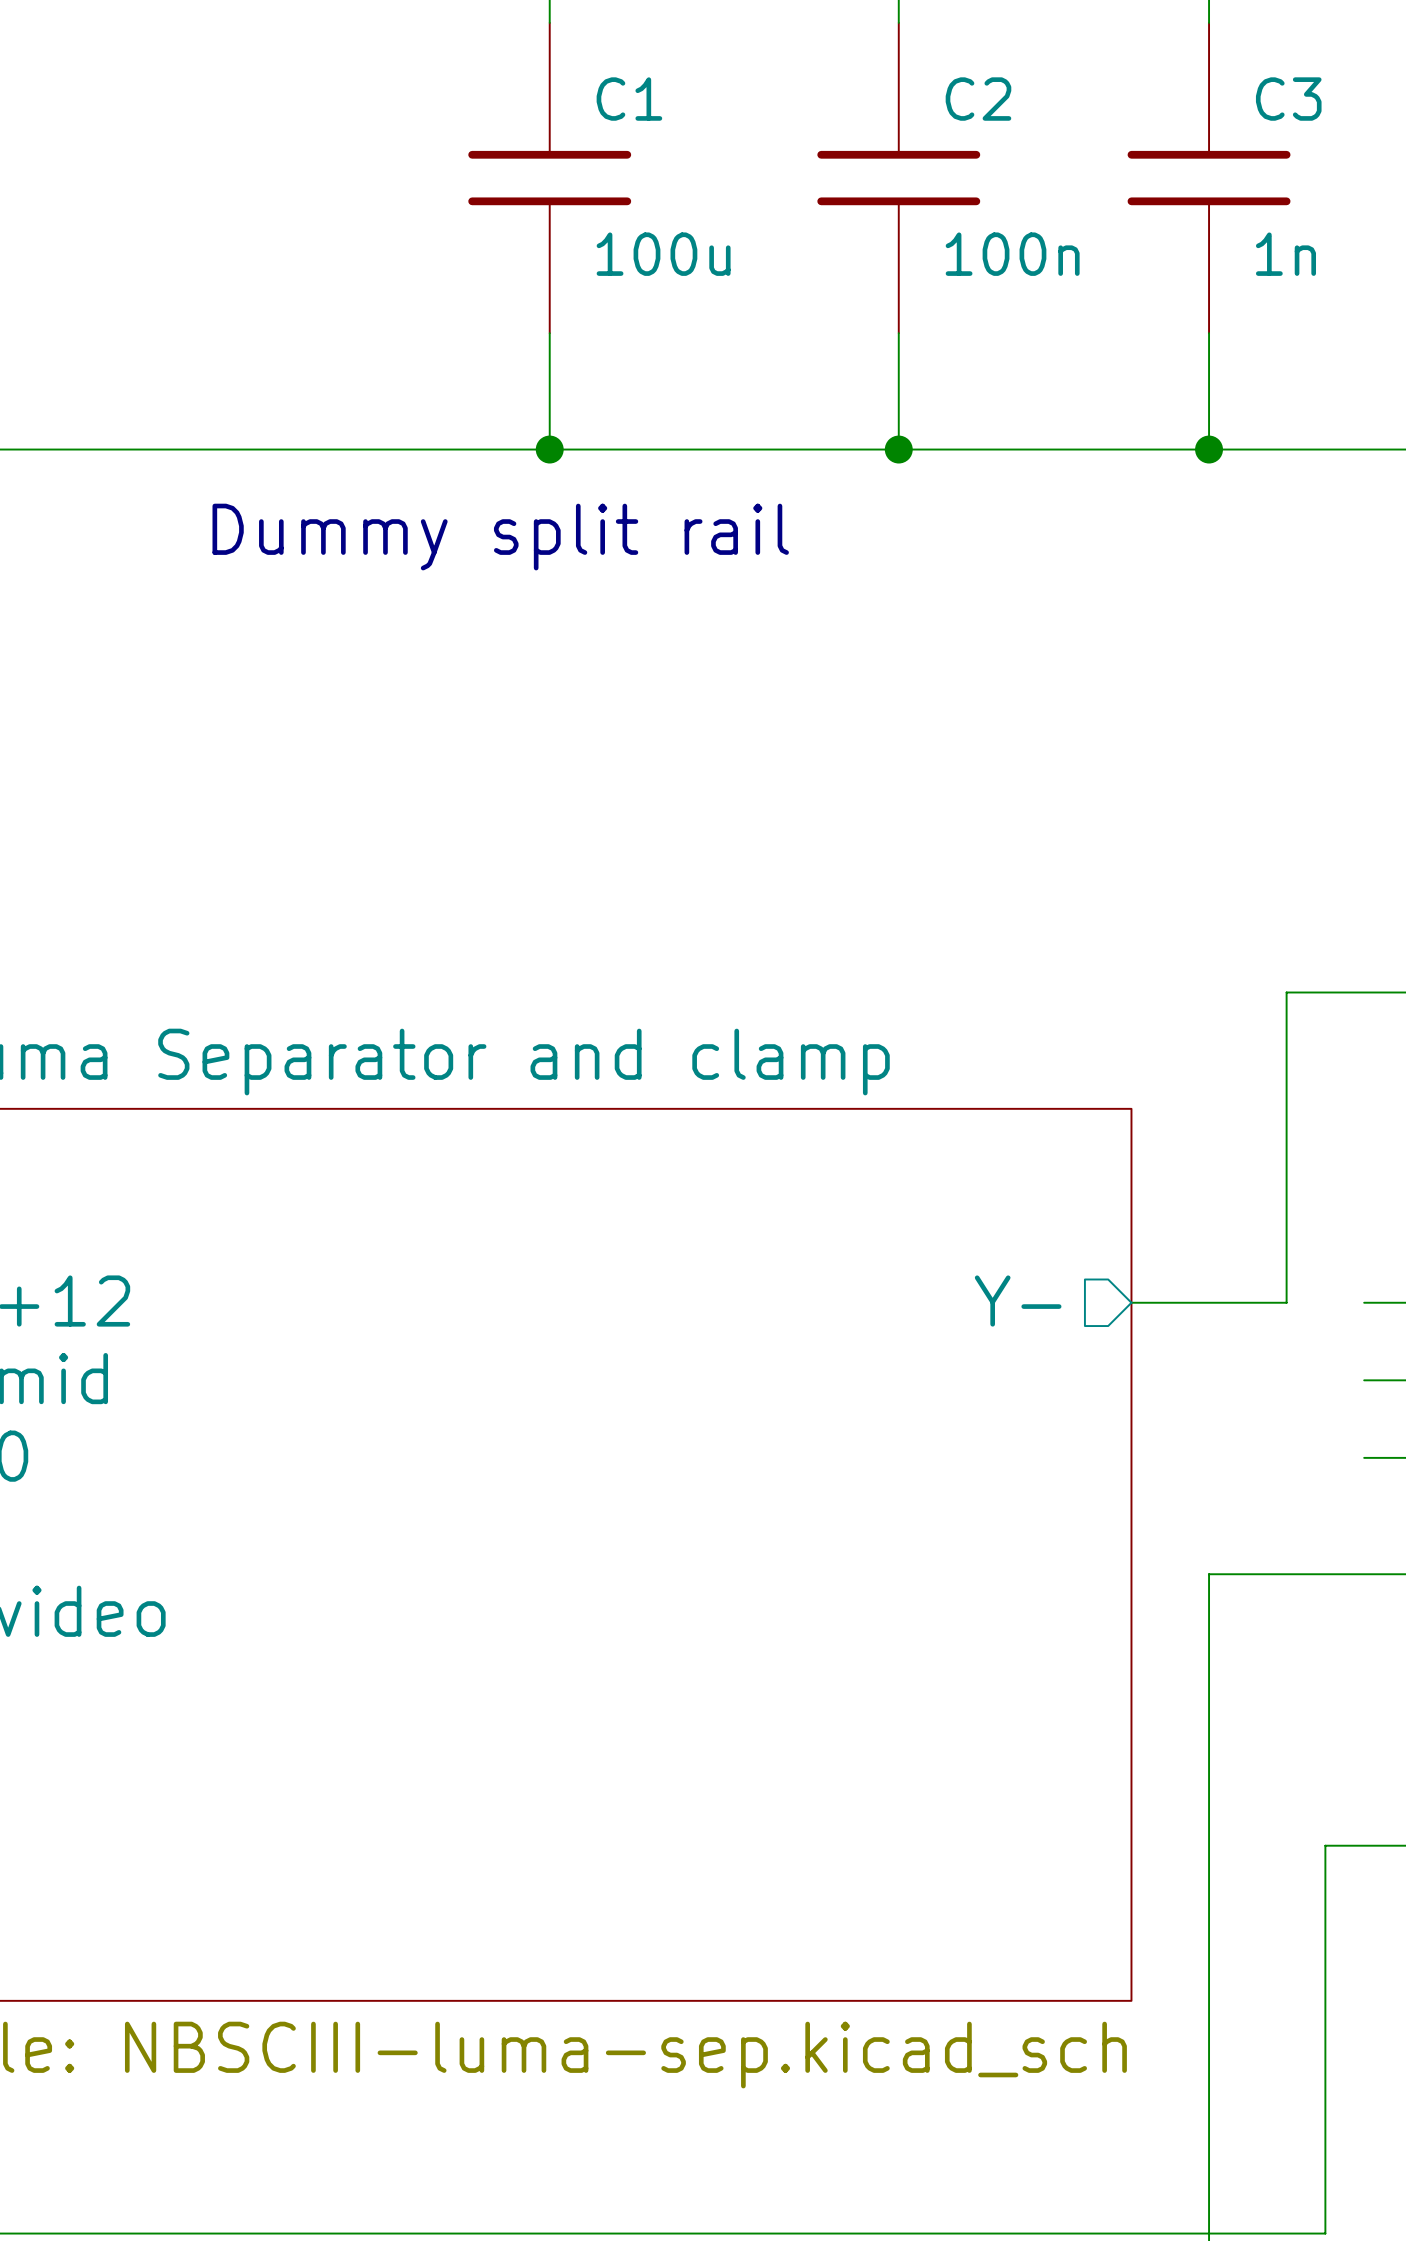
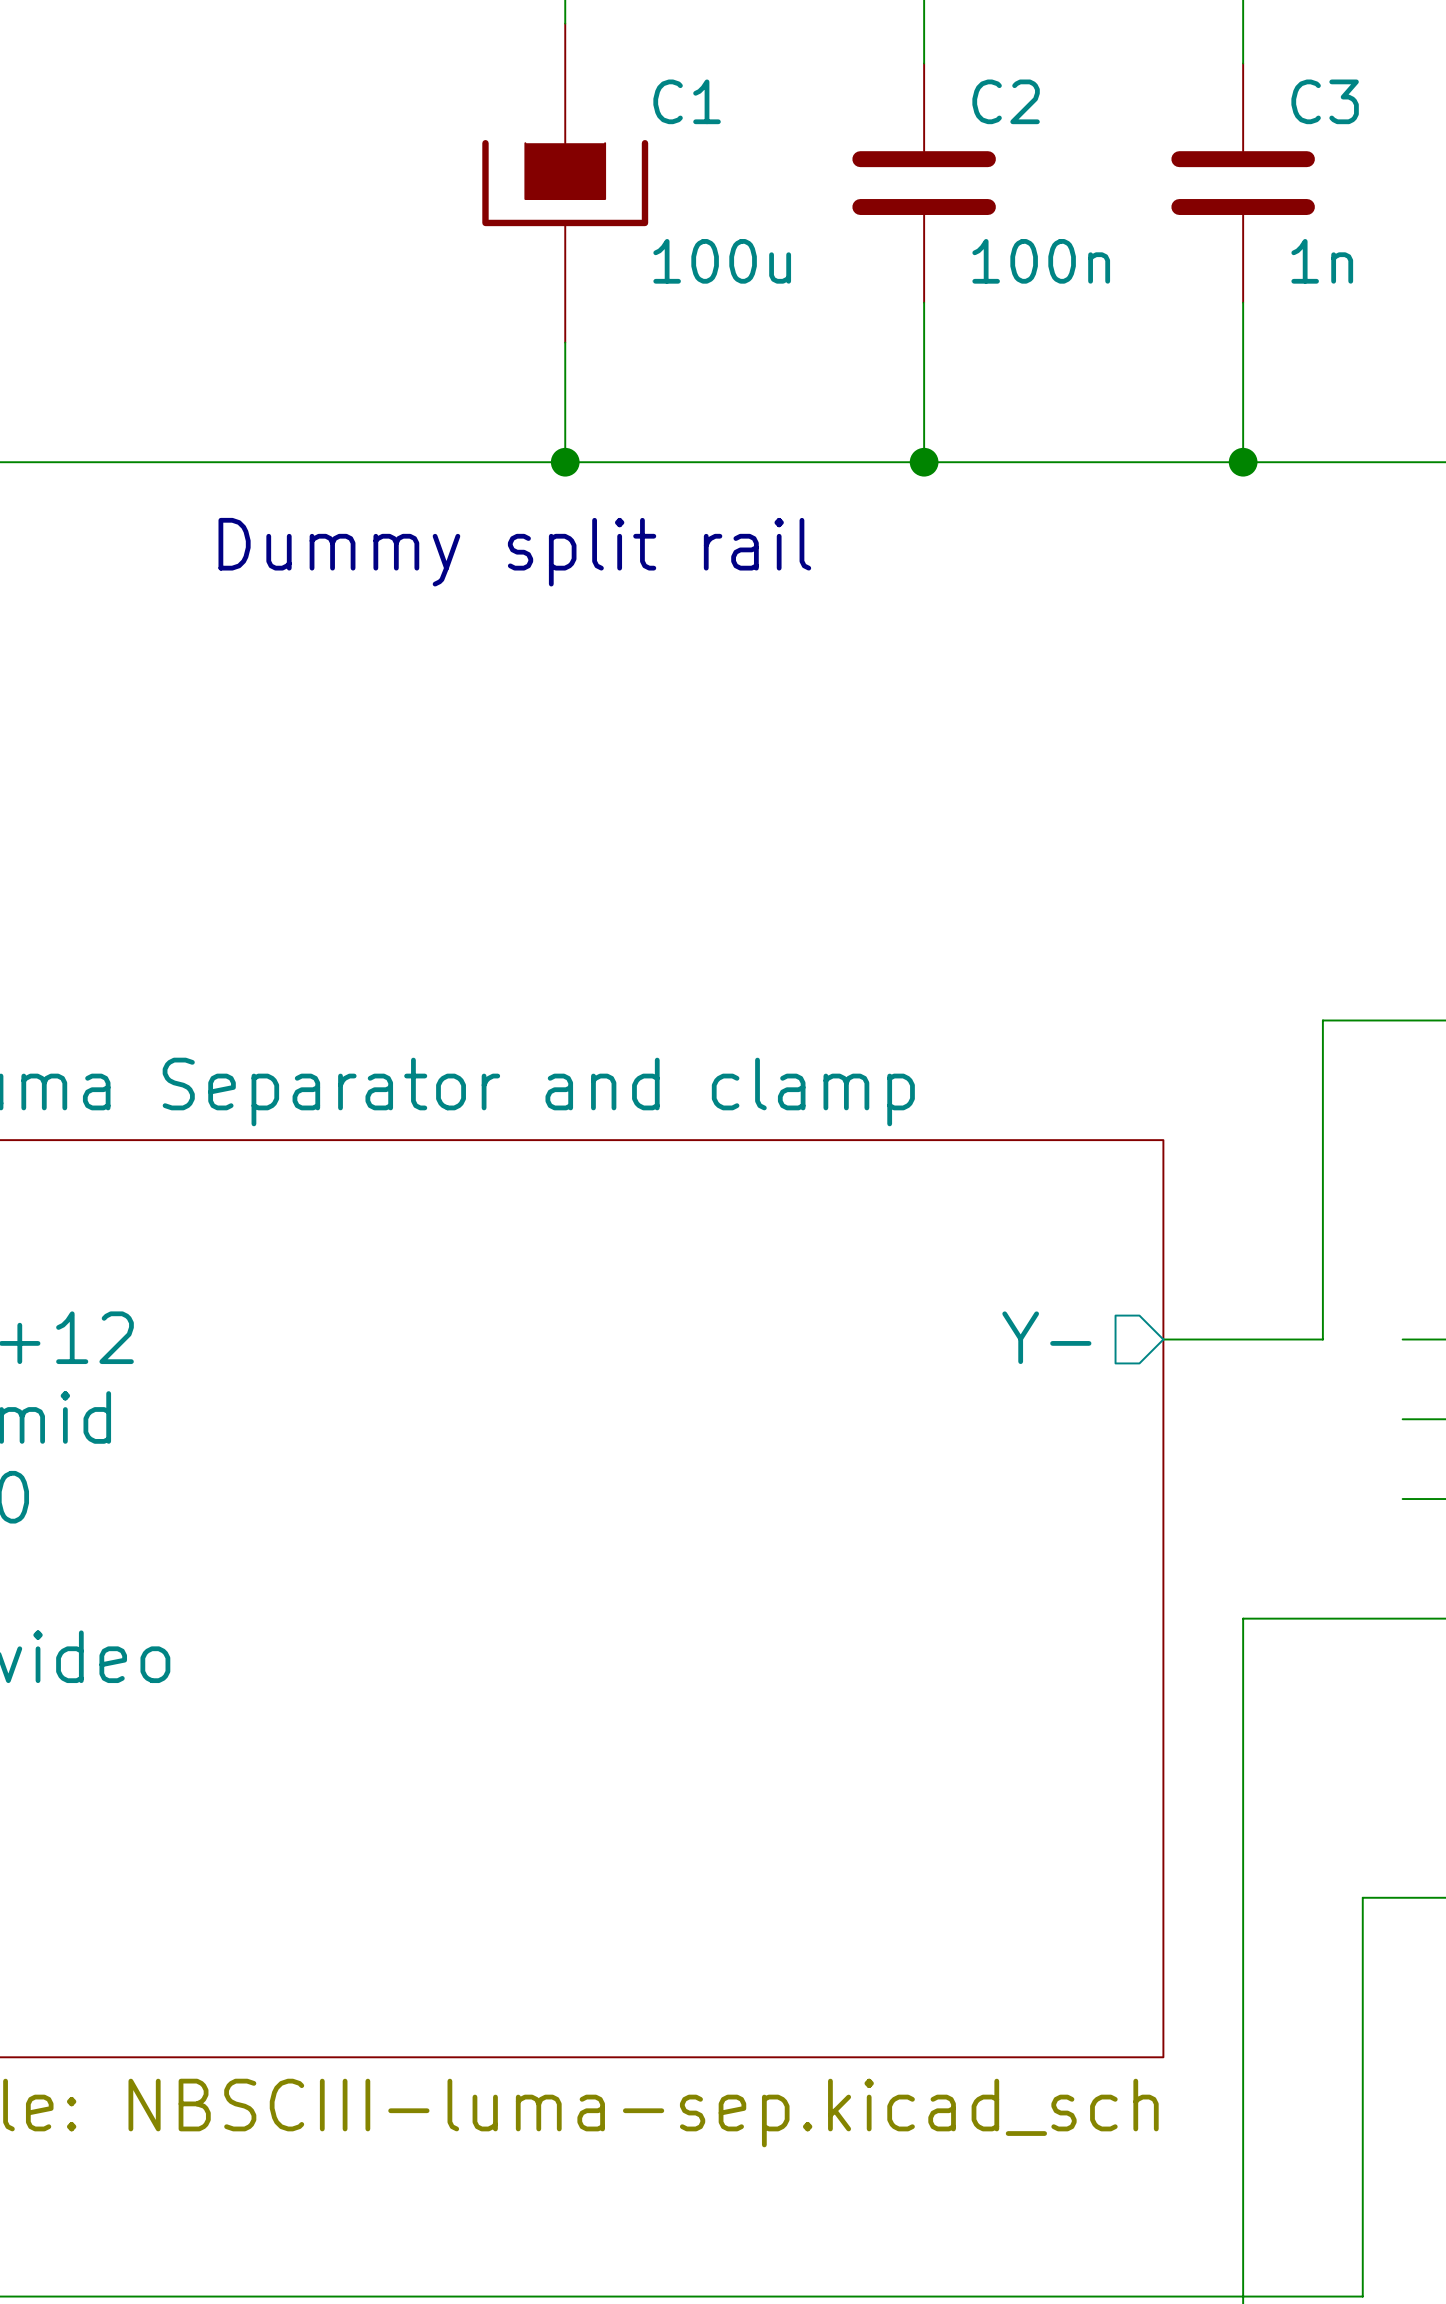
C1 symbol: [468, 22, 632, 334] -> [482, 23, 649, 343]
C2 symbol: [817, 22, 981, 334] -> [852, 63, 996, 303]
C3 symbol: [1127, 22, 1291, 334] -> [1171, 63, 1315, 303]
C1 name position: C1 (629, 99) -> C1 (687, 101)
C1 value position: 100u (663, 254) -> 100u (722, 261)

